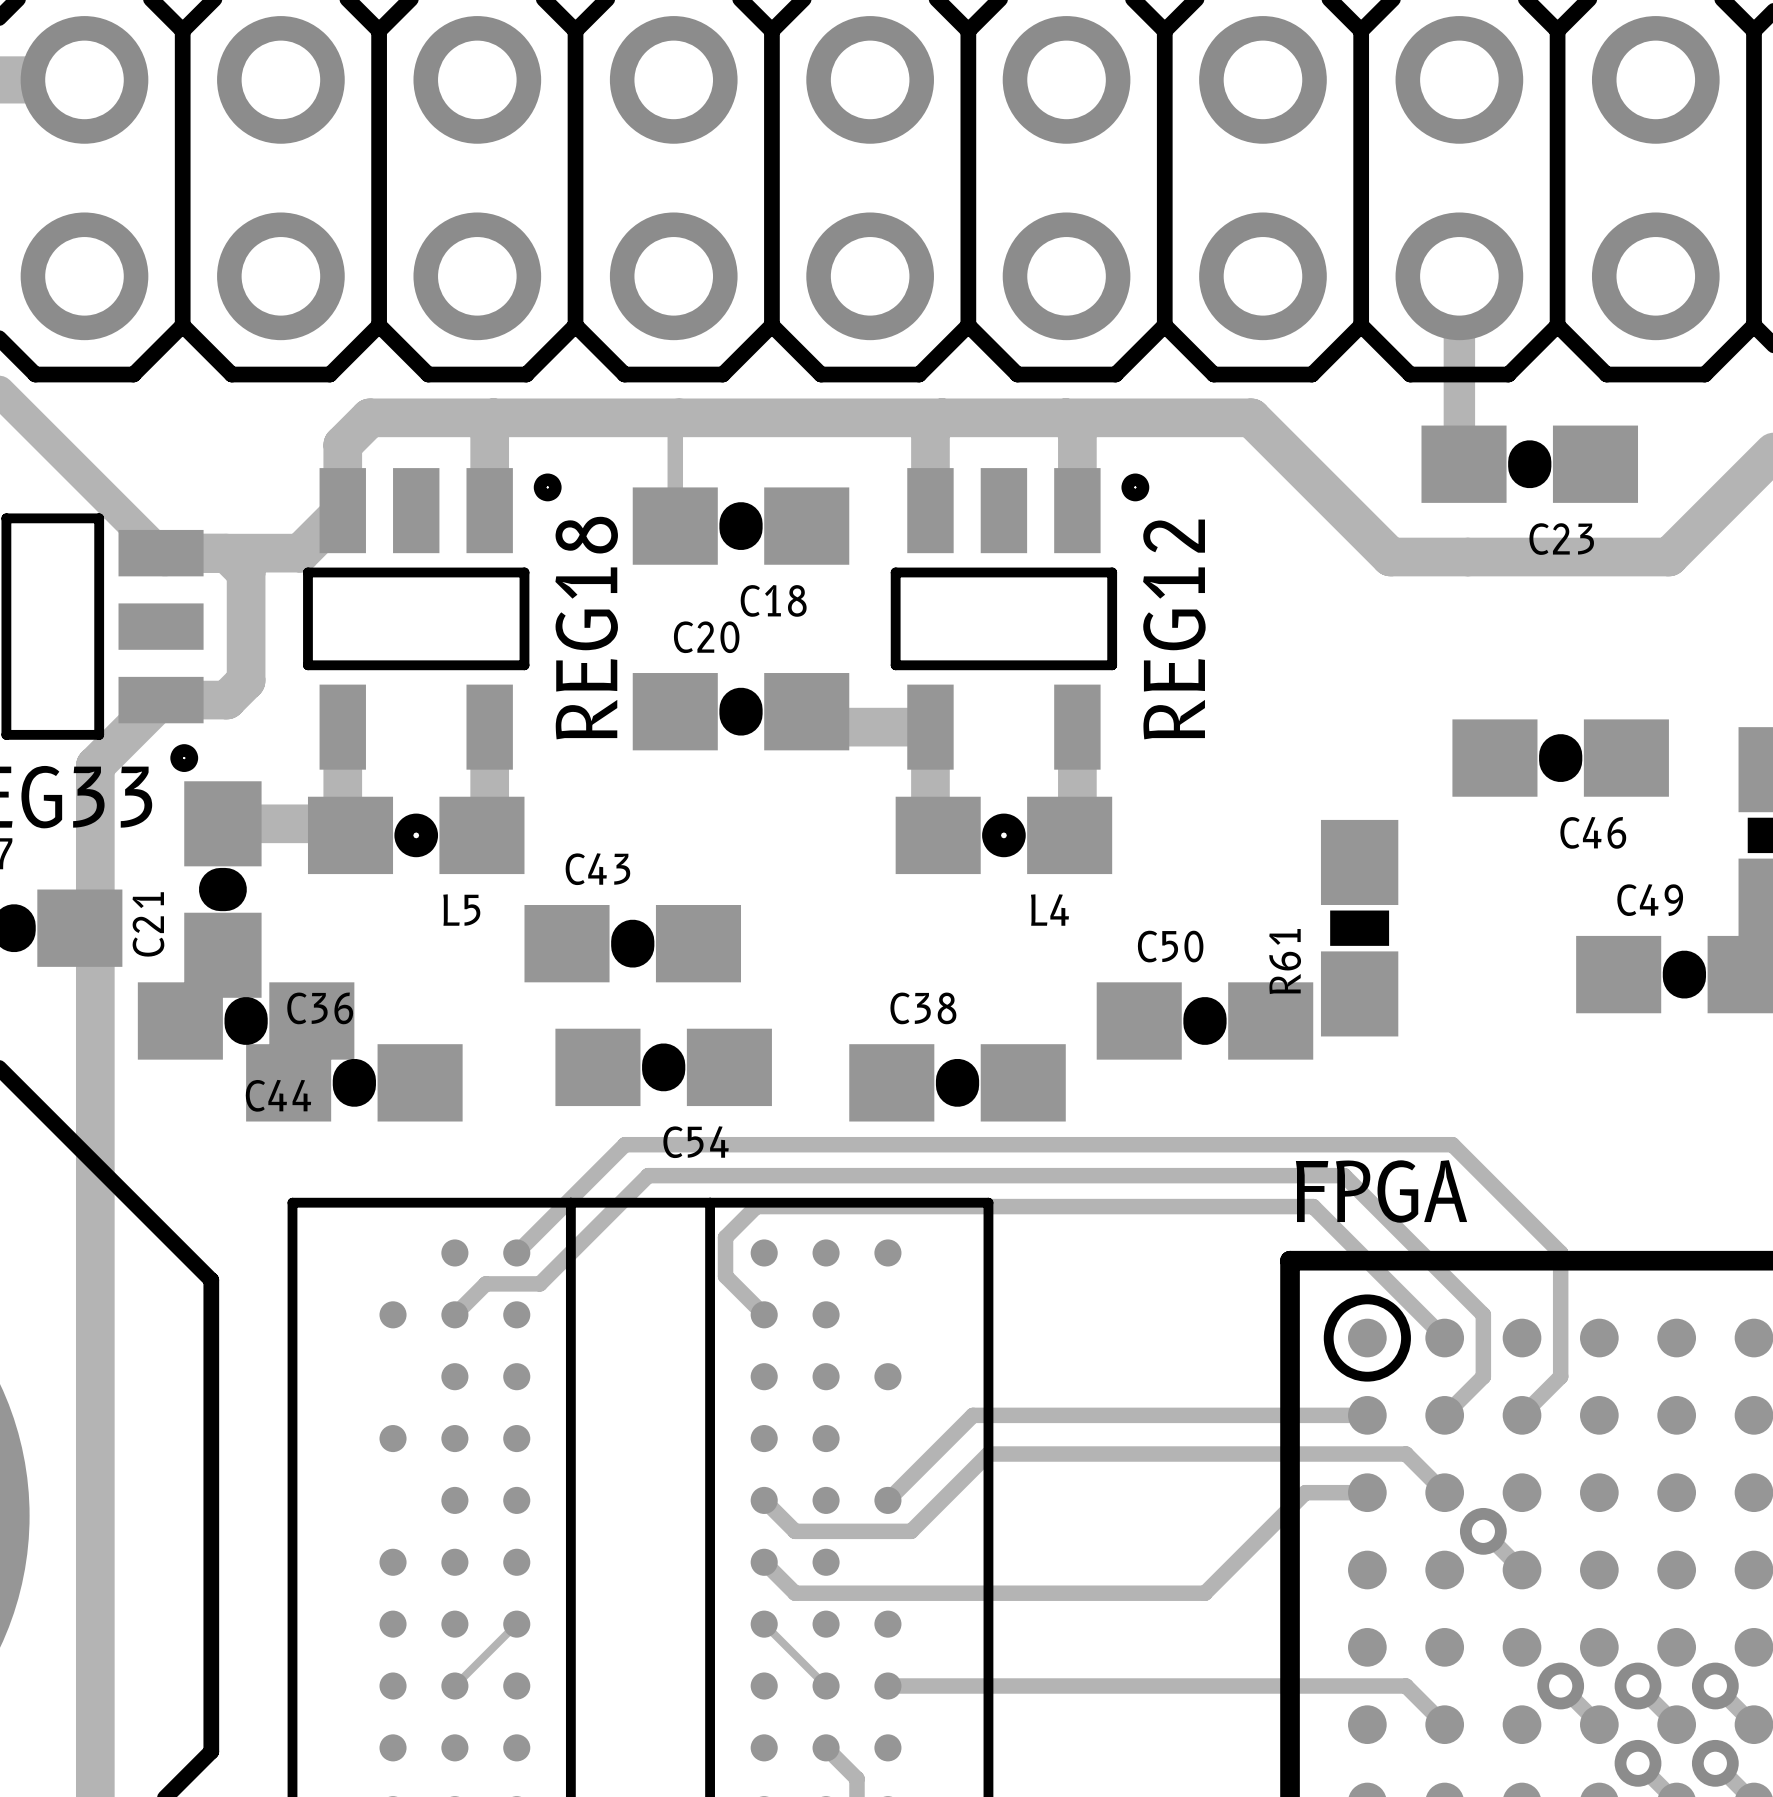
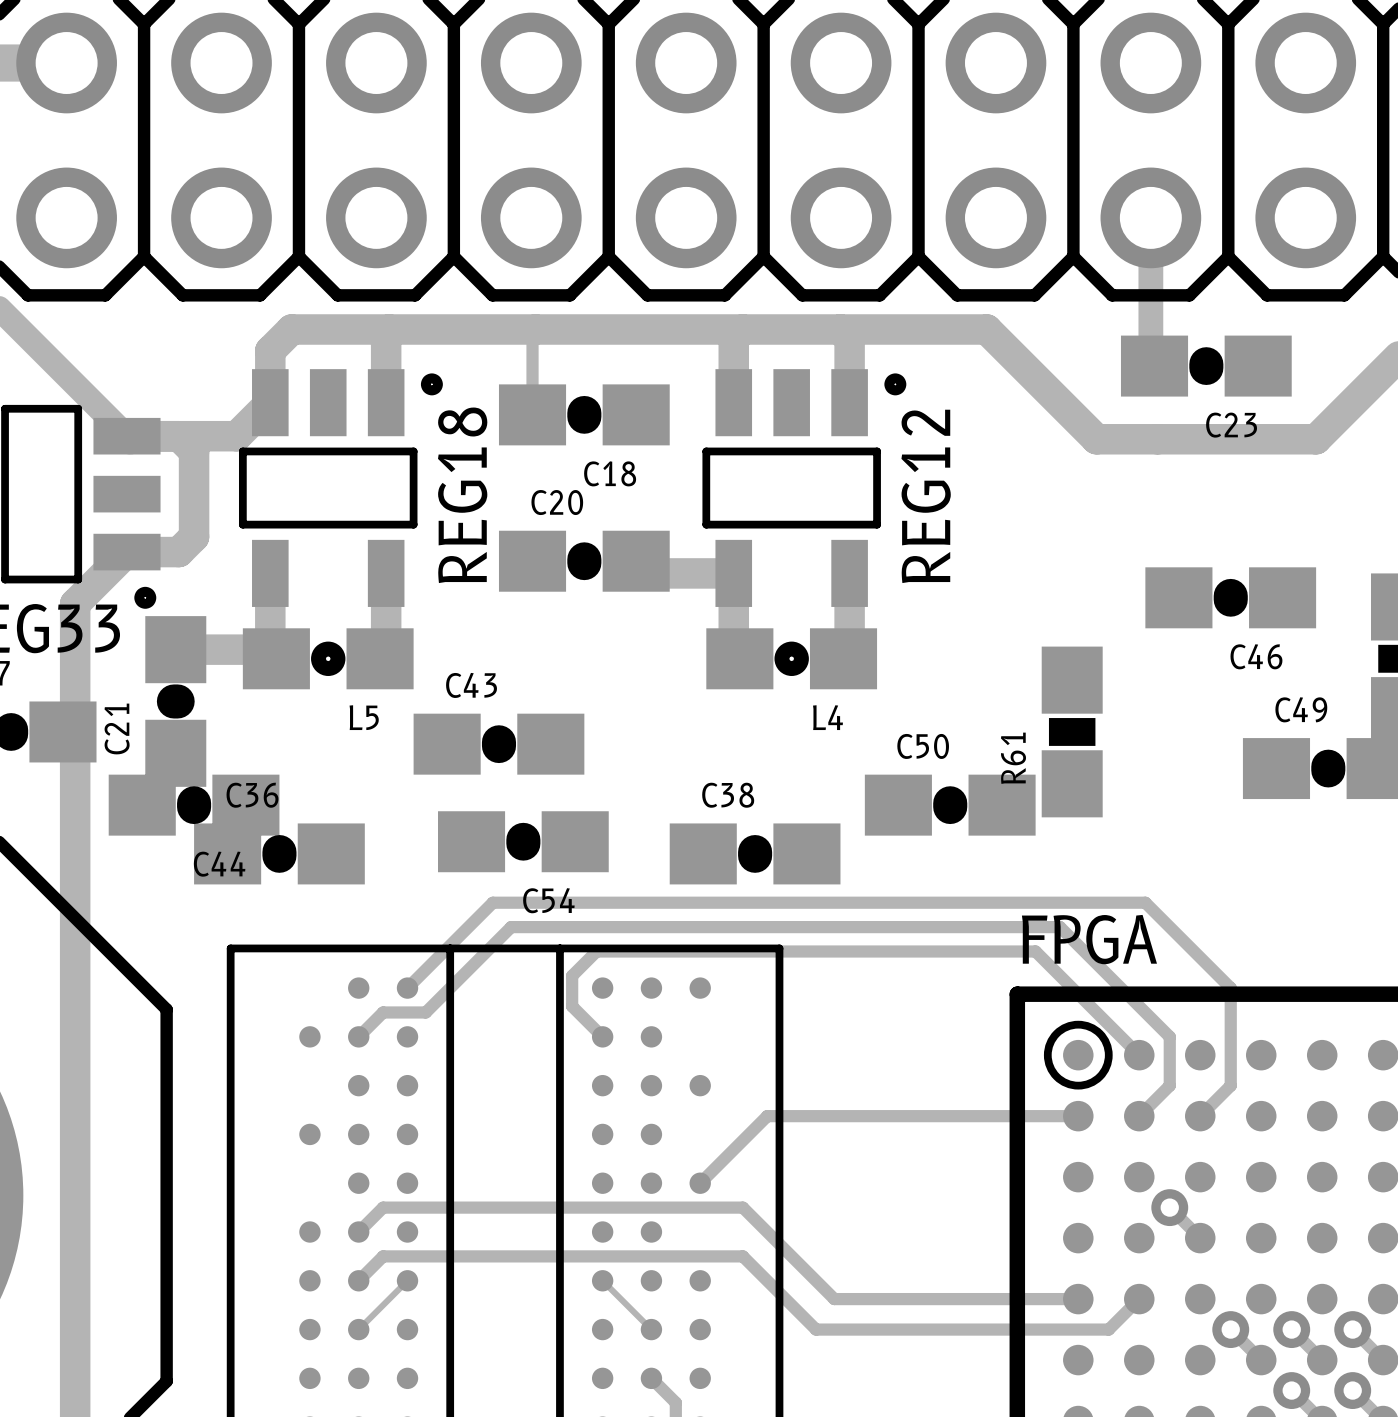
track: (1367, 1492) (1305, 1492) (1204, 1593) (942, 1593) -> none
track: (1444, 1492) (1406, 1454) (988, 1454) (911, 1531) -> (1078, 1299) (834, 1299) (742, 1207) (718, 1207)
track: (764, 1500) (795, 1531) -> (358, 1232) (383, 1207) (627, 1207)
track: (764, 1562) (795, 1593) -> (358, 1280) (383, 1256) (627, 1256)
track: (887, 1686) (1034, 1686) -> (742, 1256) (816, 1329)
track: (1406, 1686) (1444, 1724) -> (1108, 1329) (1139, 1299)

